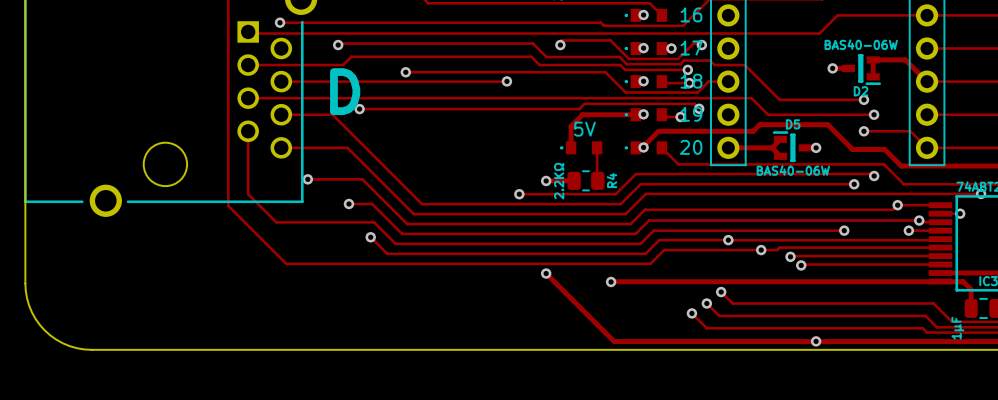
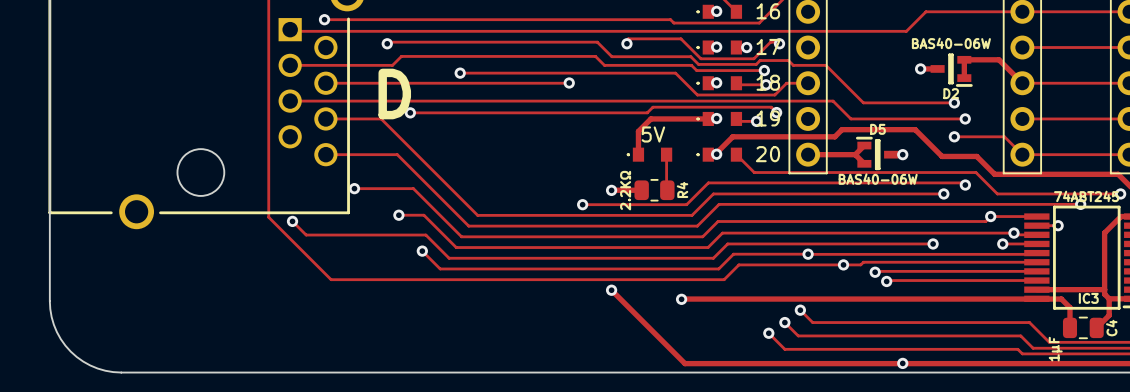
track: (248, 131) (248, 194) (276, 222) -> (292, 221) (306, 235) (320, 235)
via: none -> (292, 221)

